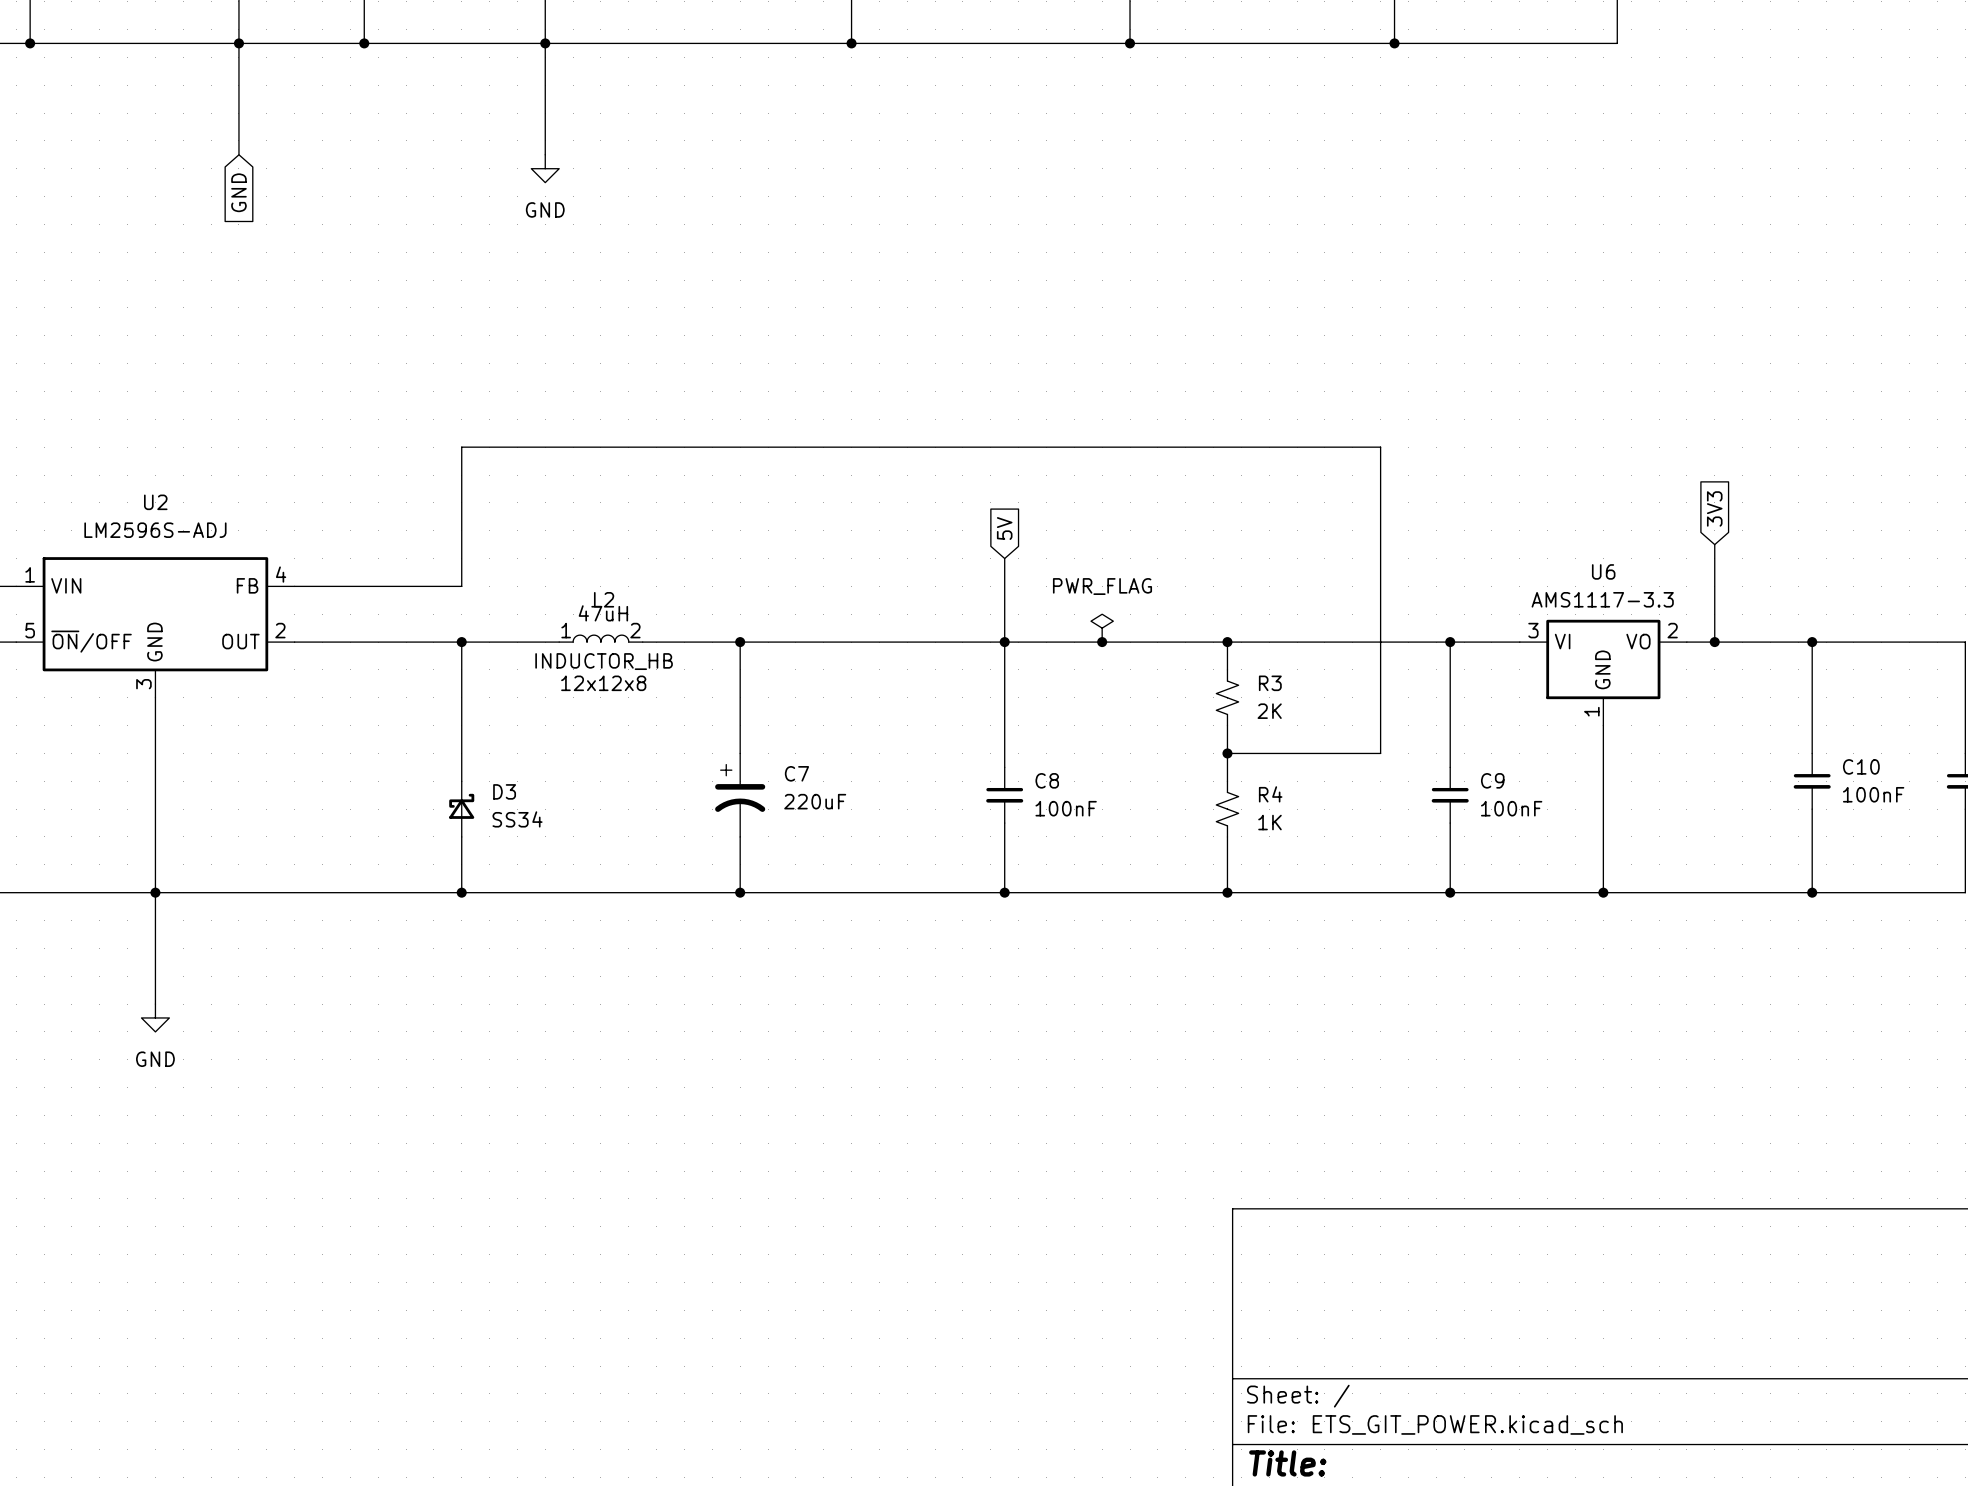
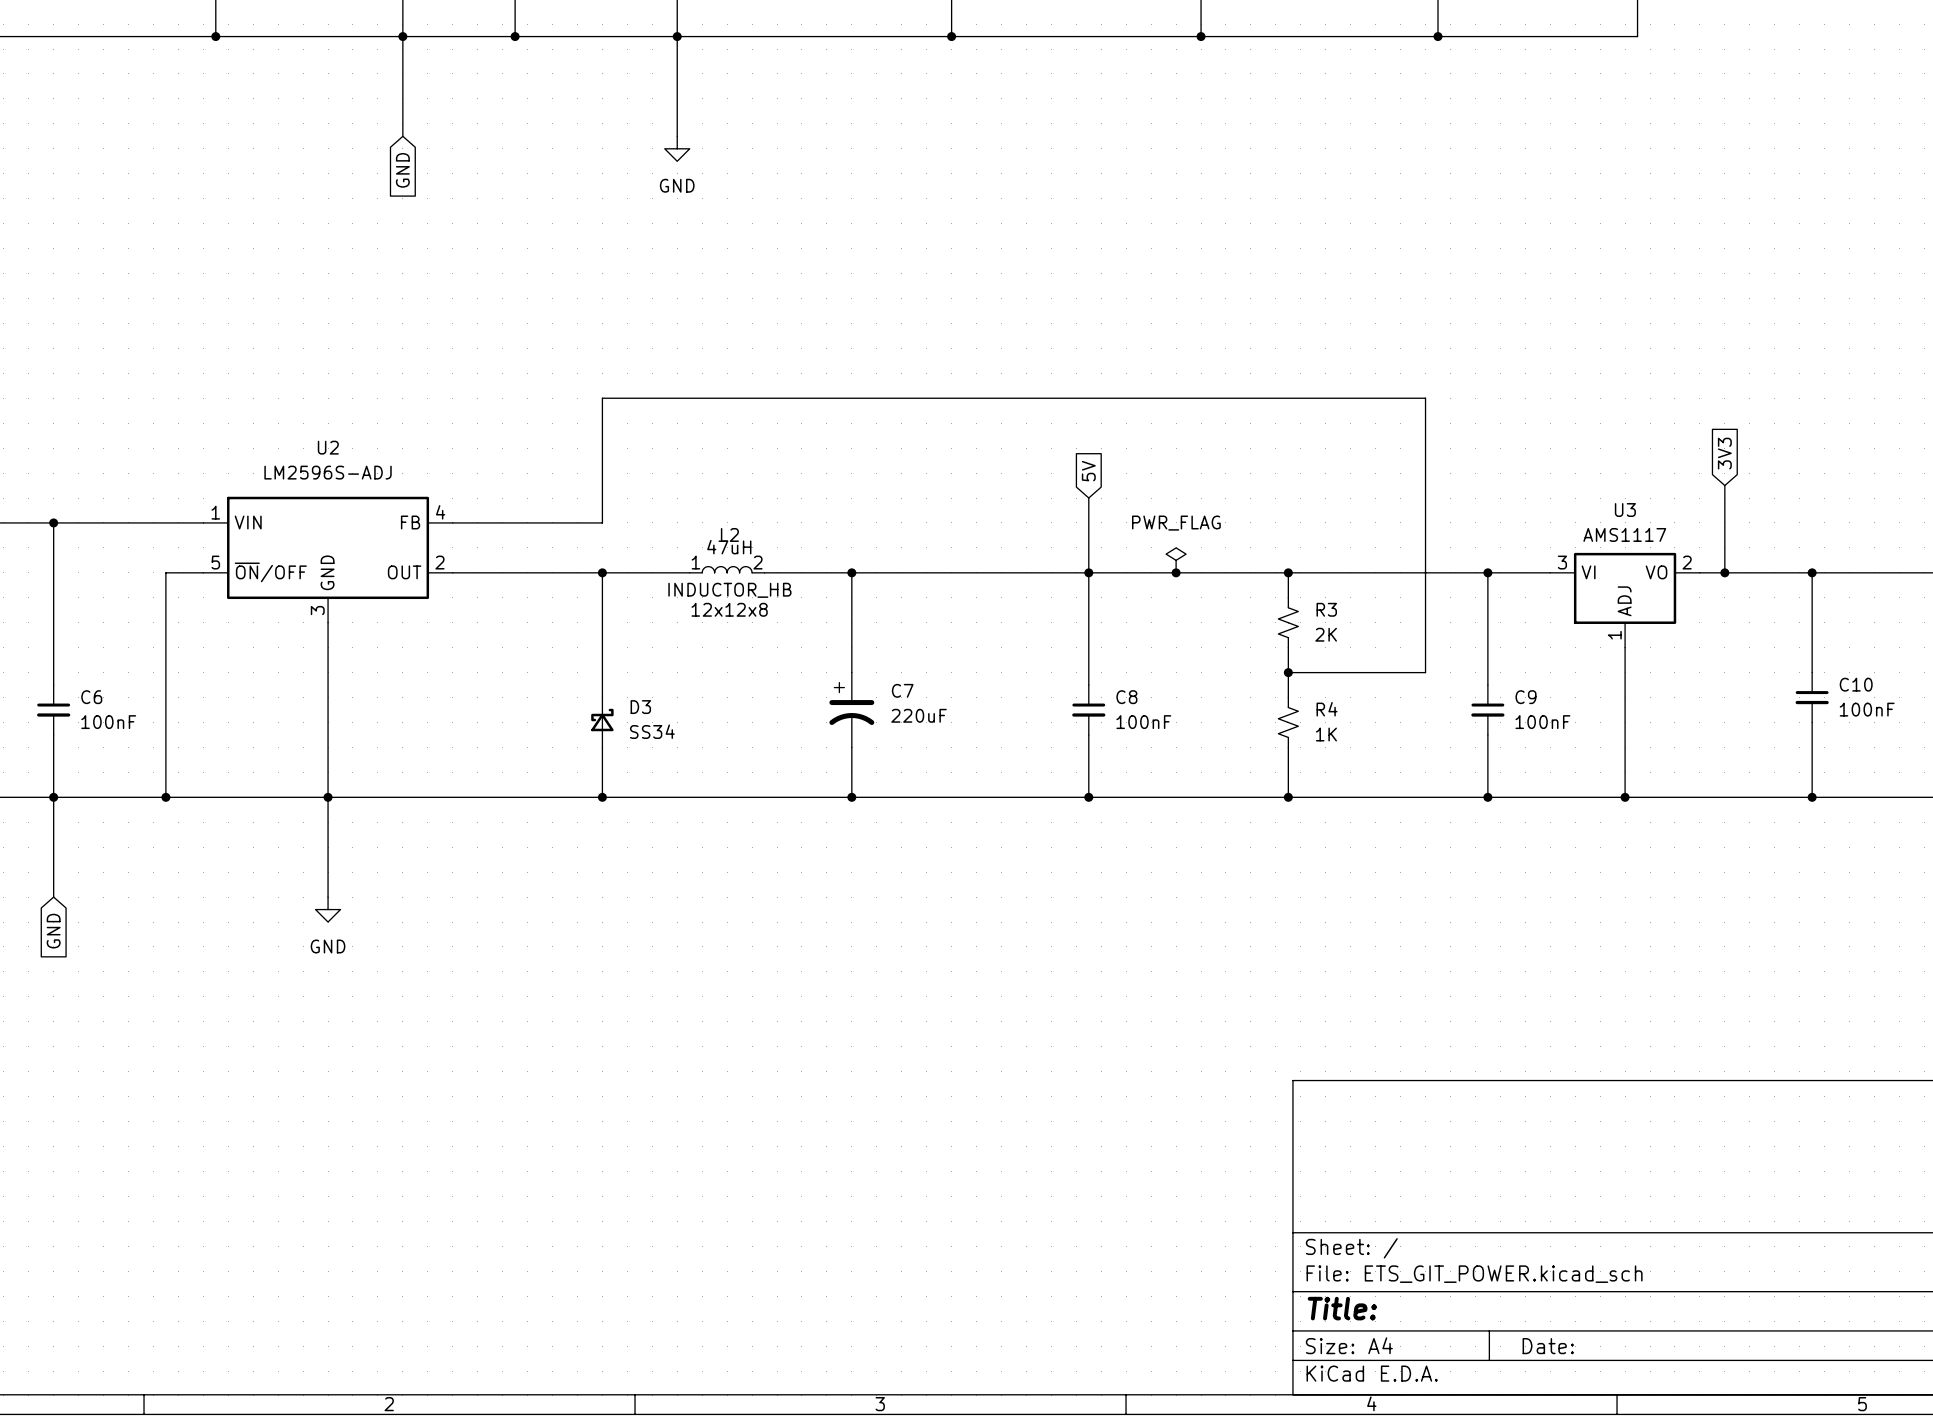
U6 name: U6 (1603, 571) -> U3 (1625, 510)
U6 value: AMS1117-3.3 (1602, 599) -> AMS1117 (1624, 534)
U6 pin name: GND (1602, 669) -> ADJ (1624, 601)

